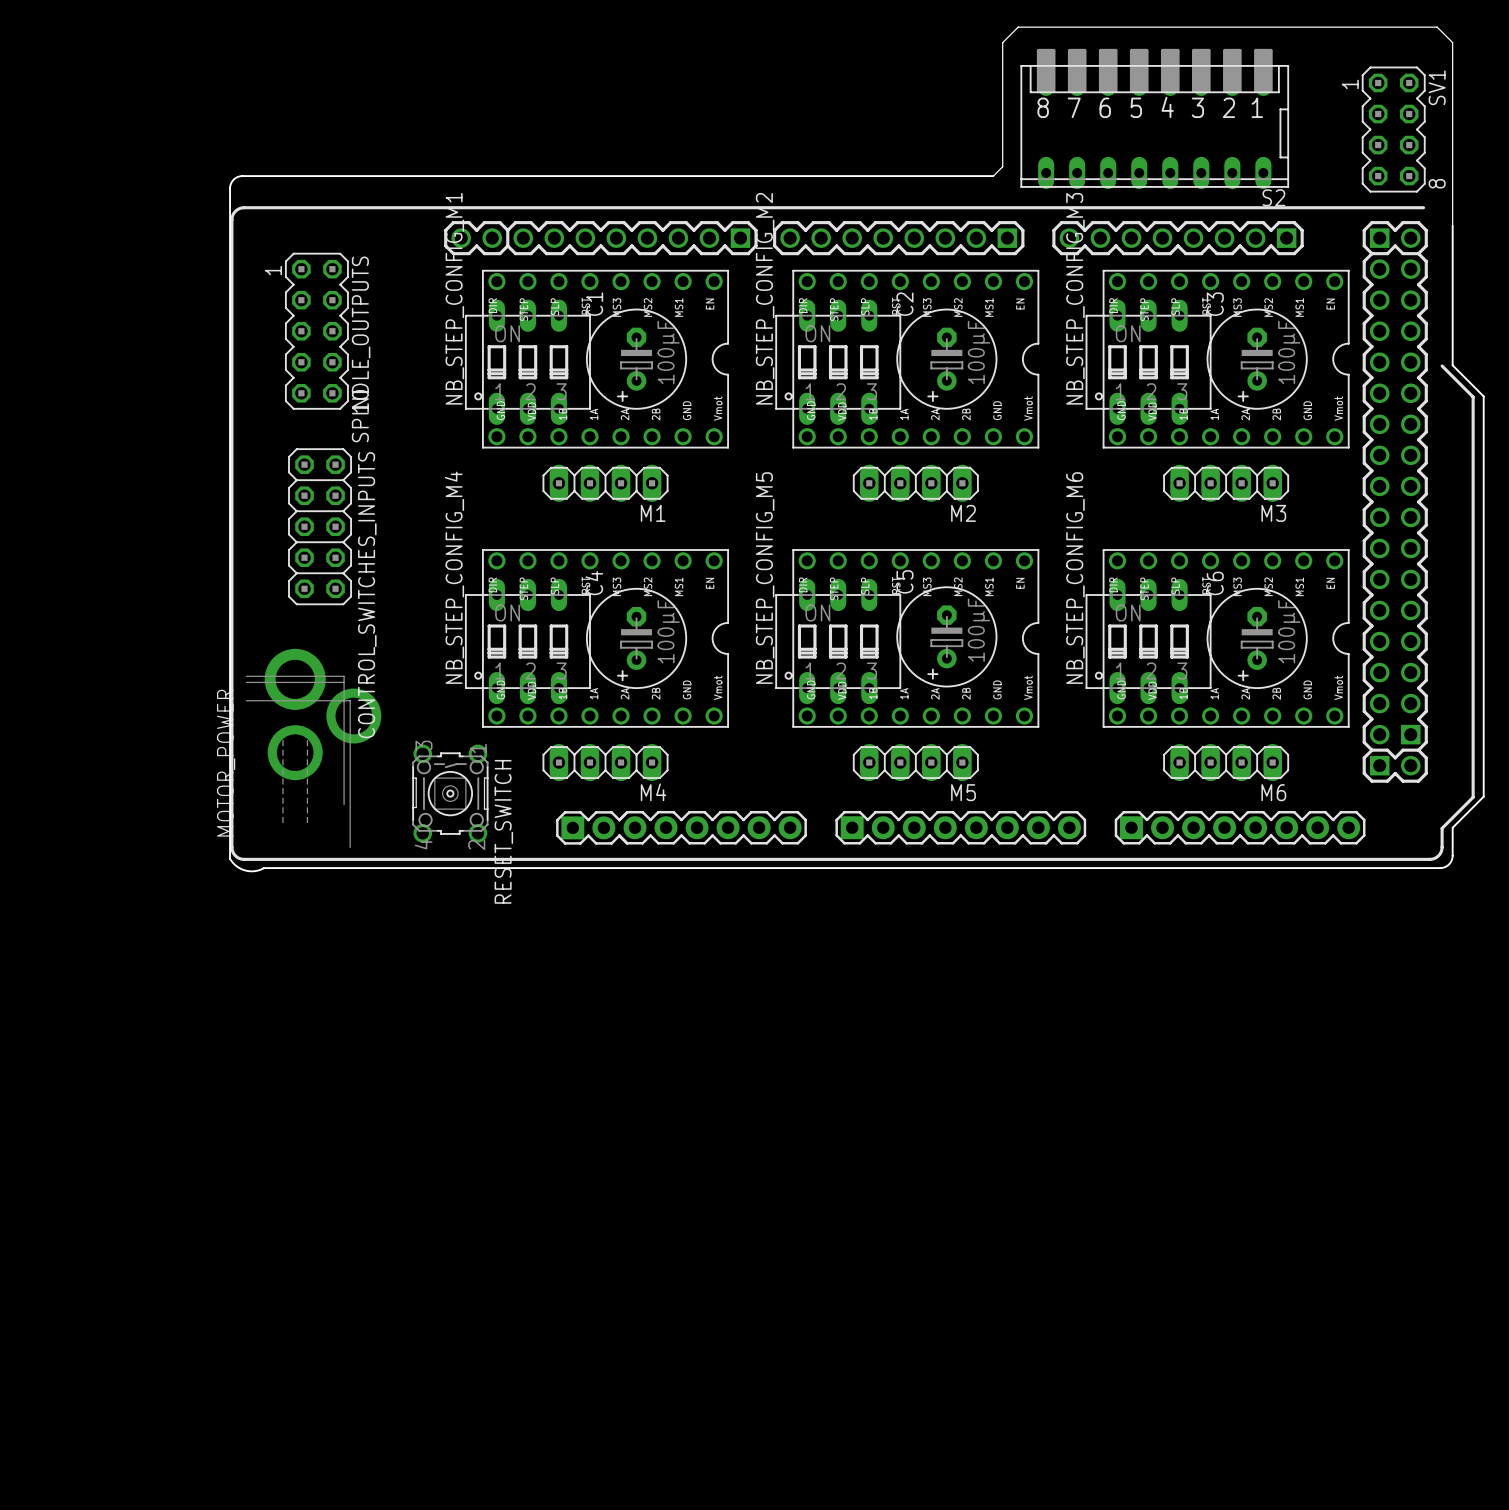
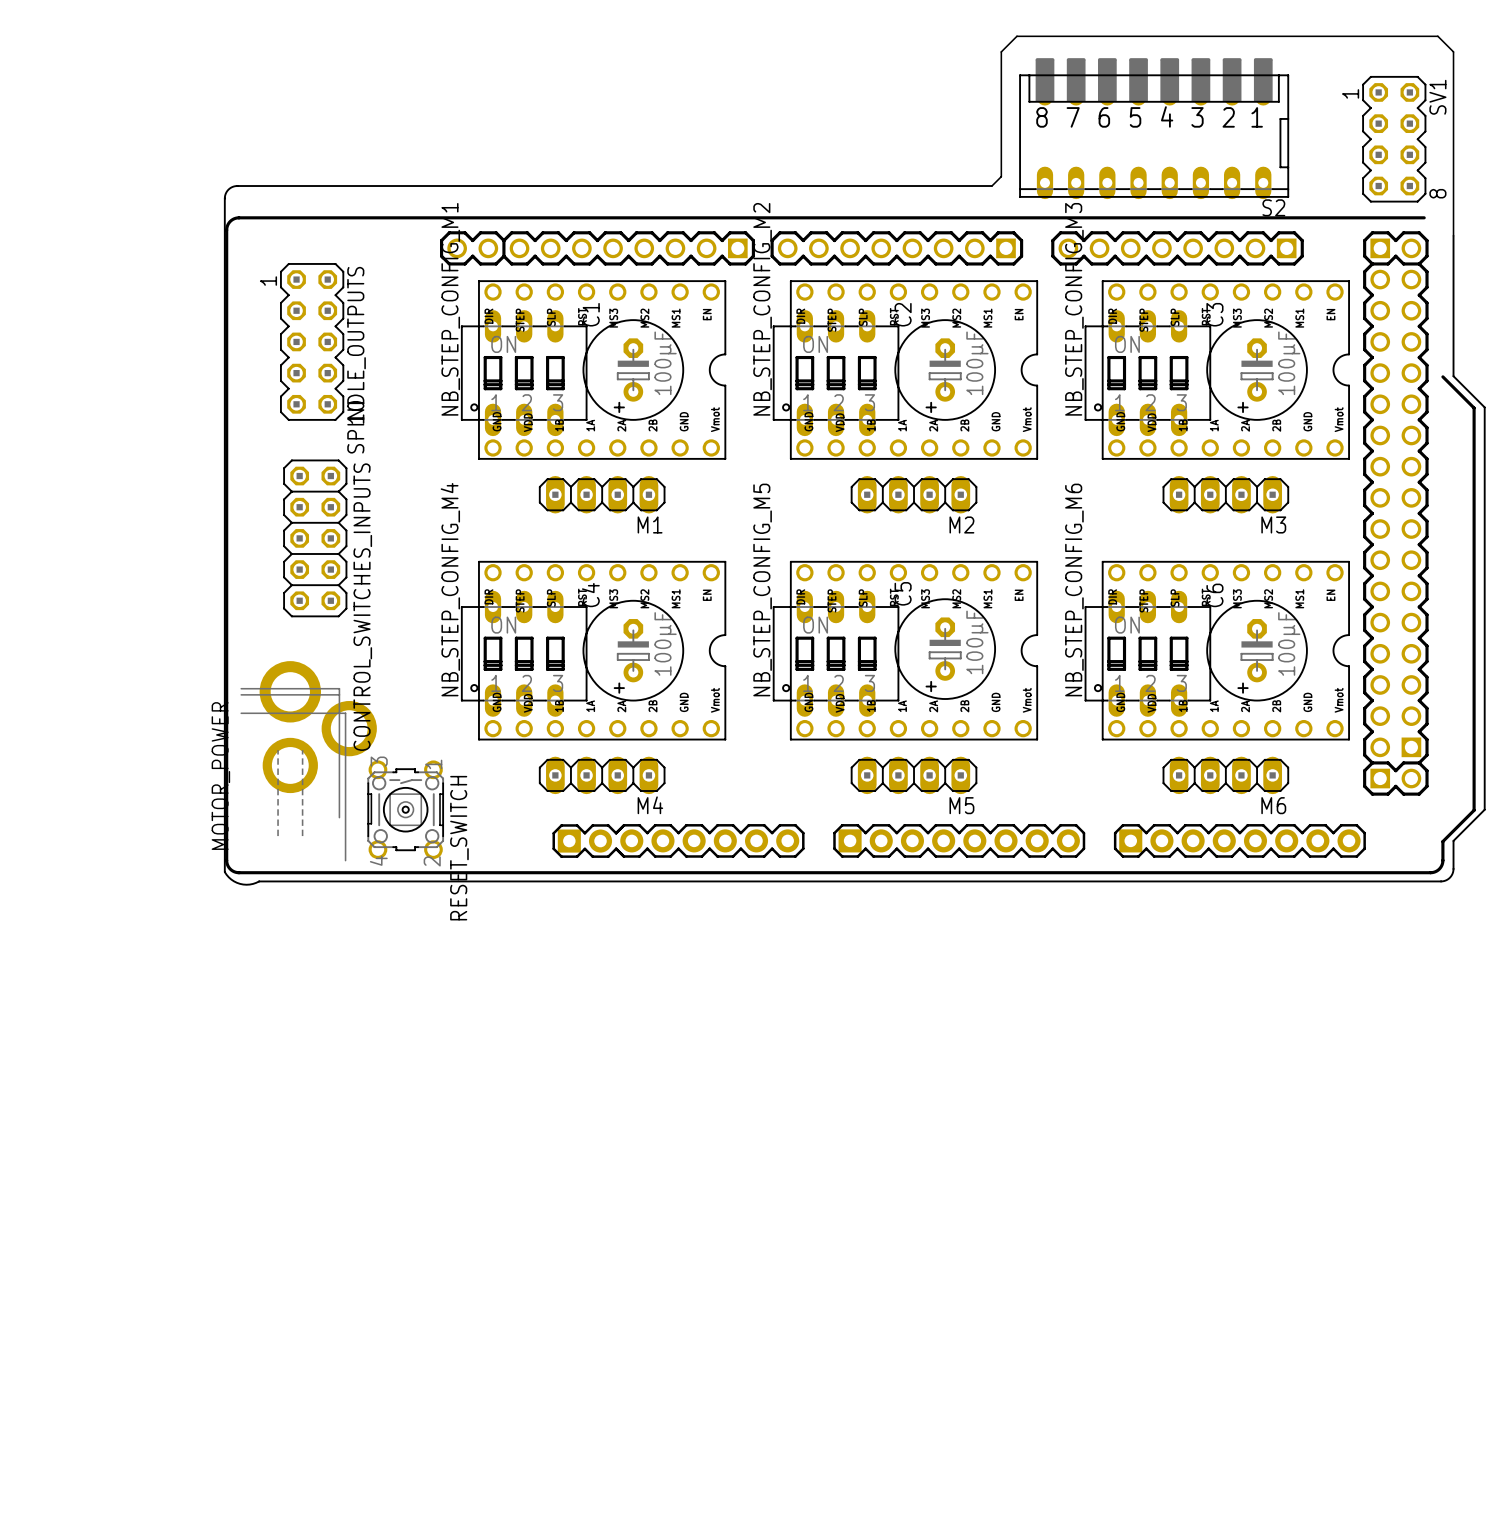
RESET_SWITCH position: (450, 793) -> (405, 809)

